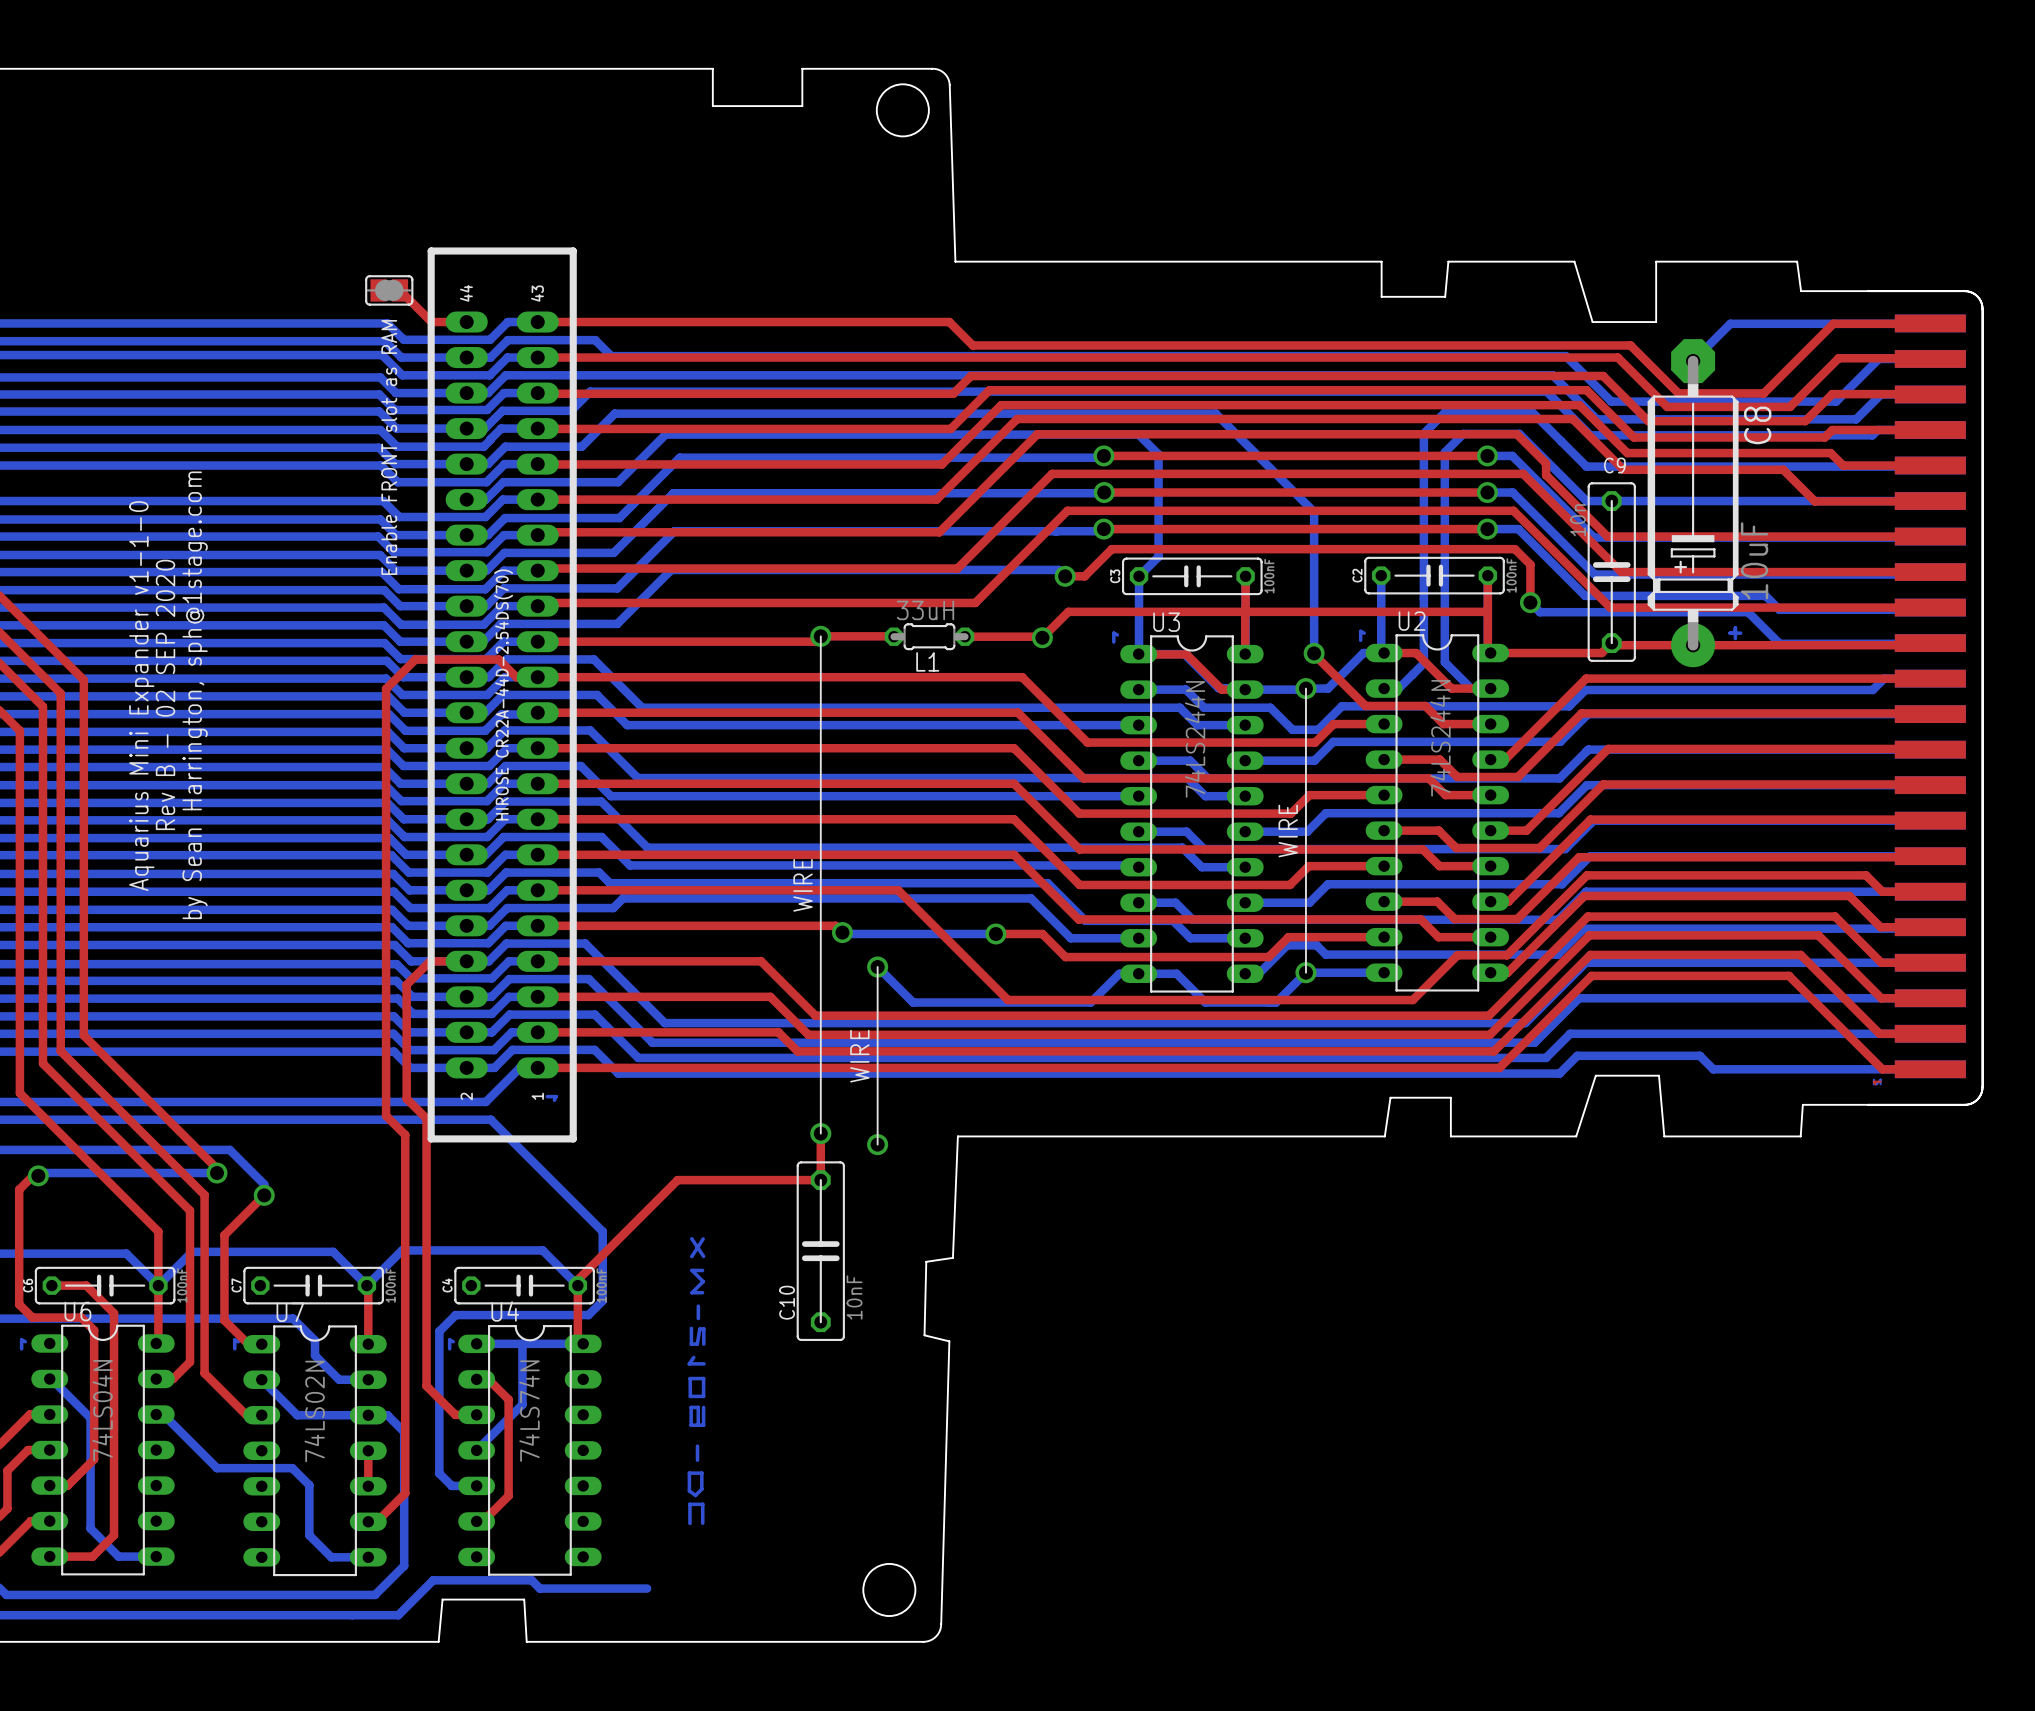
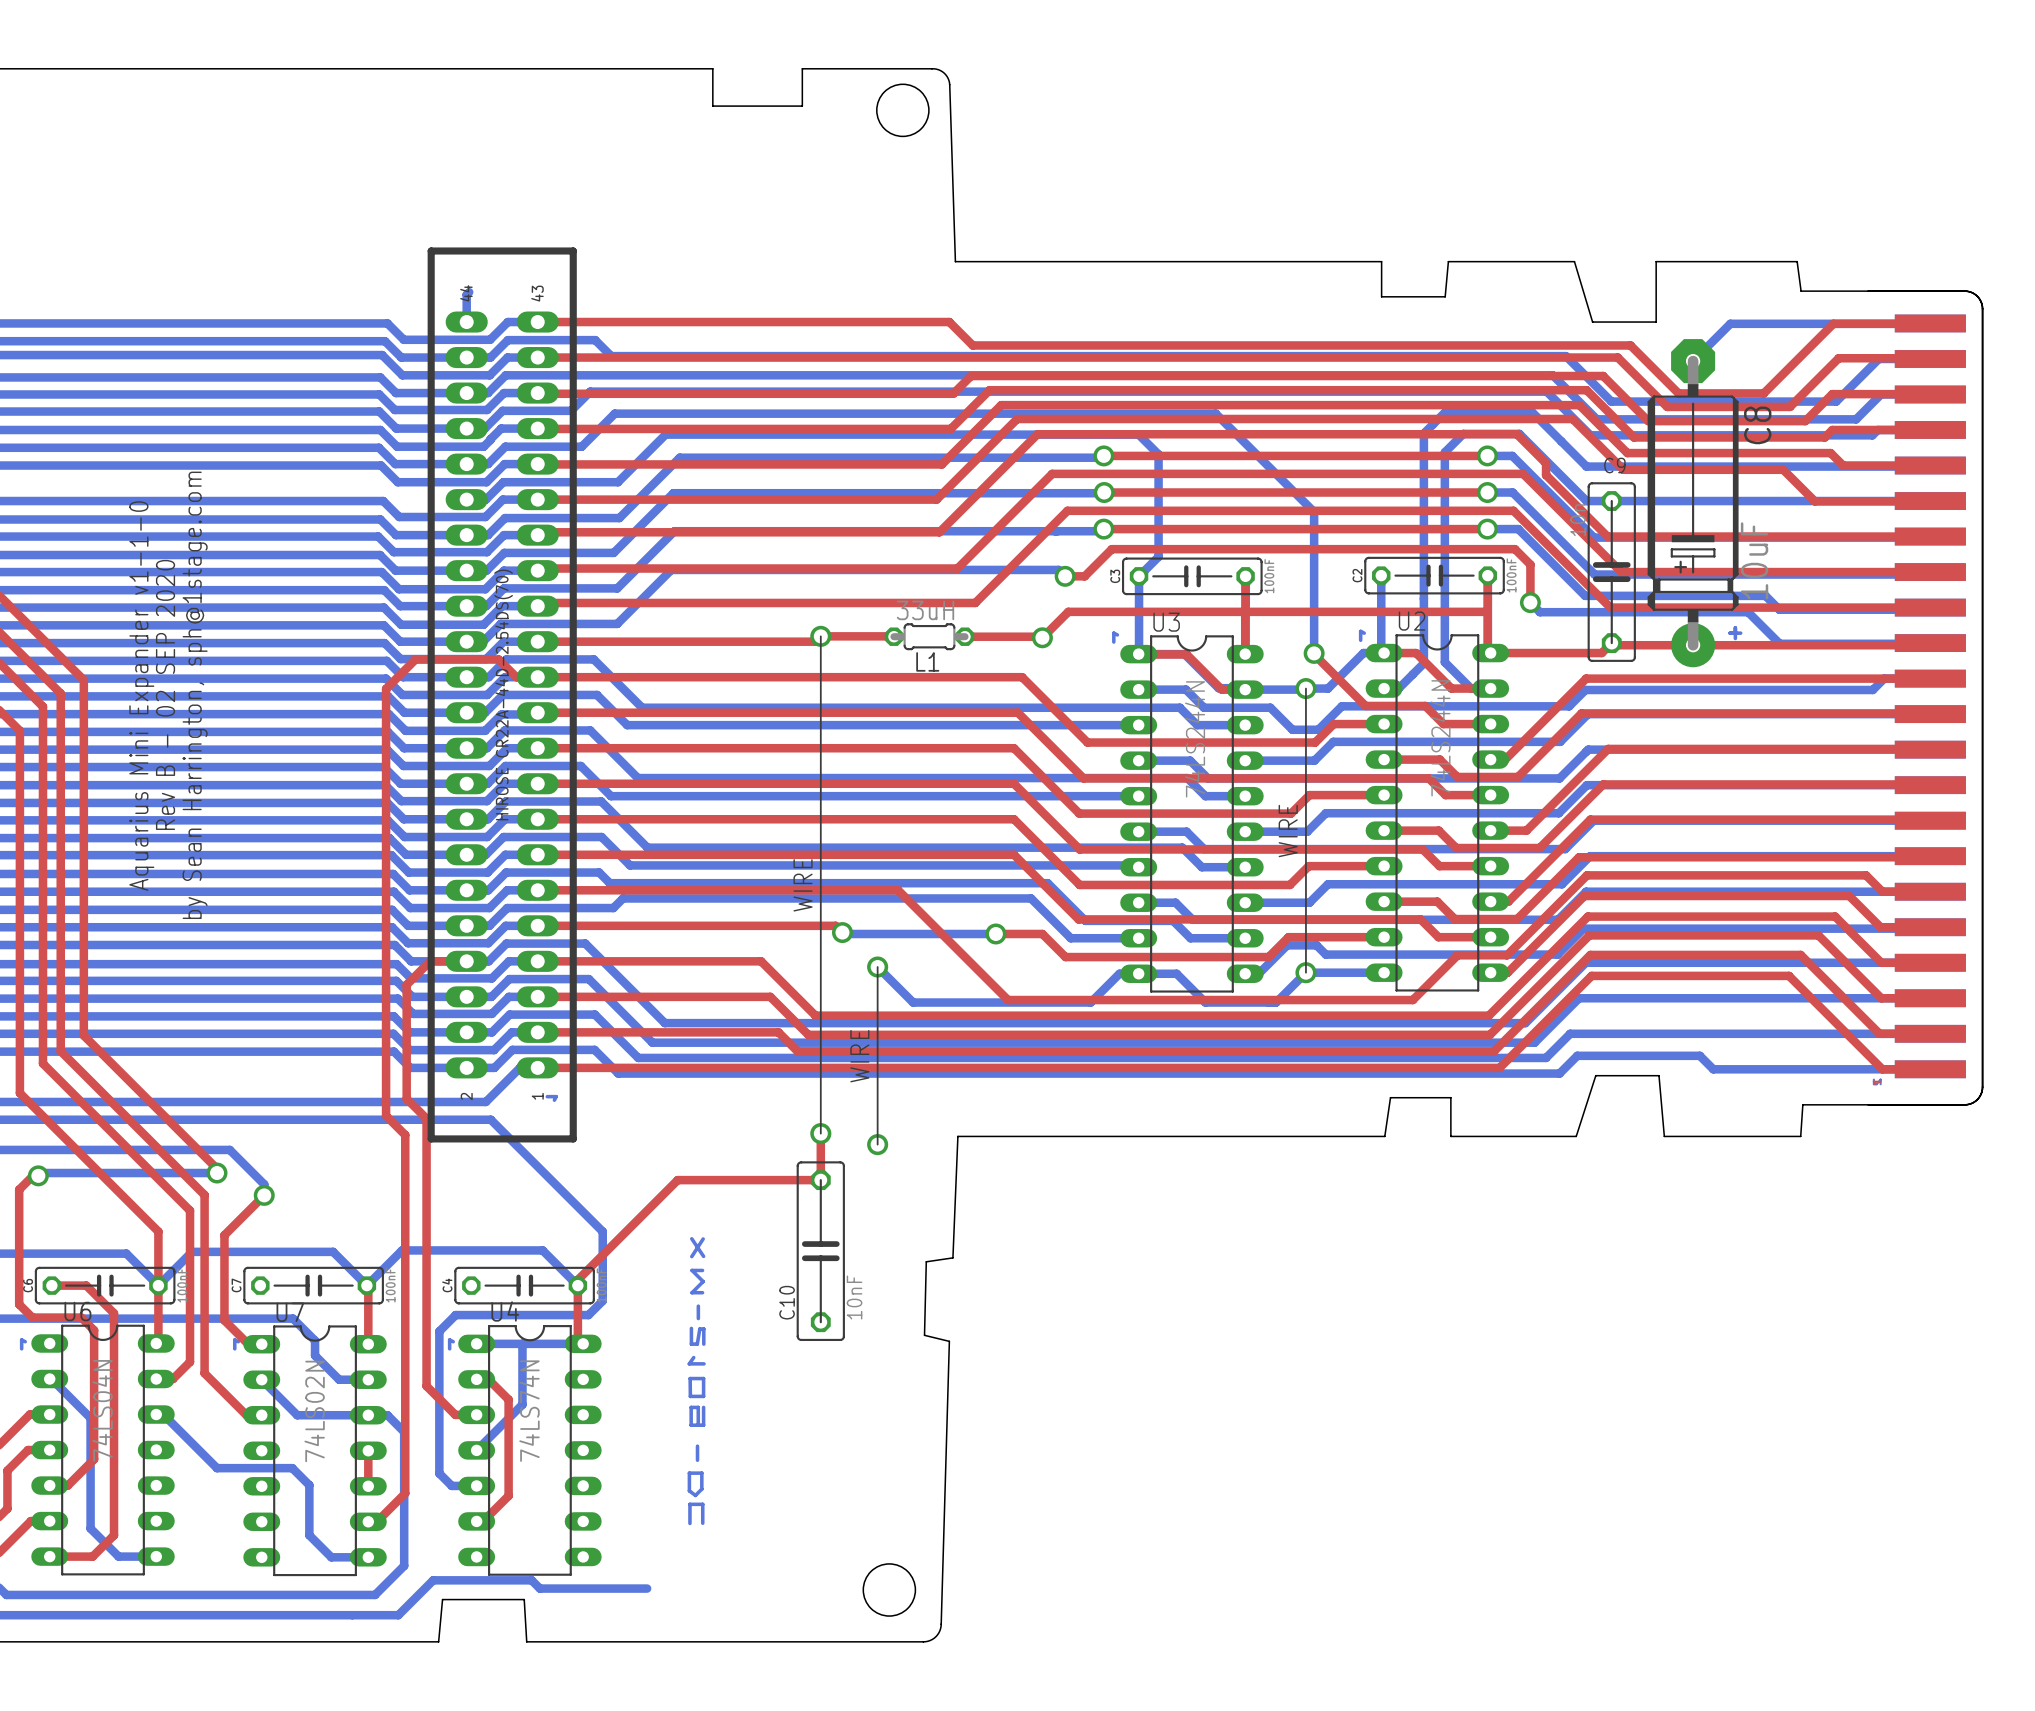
part: (389, 290) -> none
top track: (399, 290) (431, 322) (466, 322) -> none
bottom track: none -> (469, 292) (466, 294) (466, 322)
text: Enable FRONT slot as RAM (389, 447) -> none

